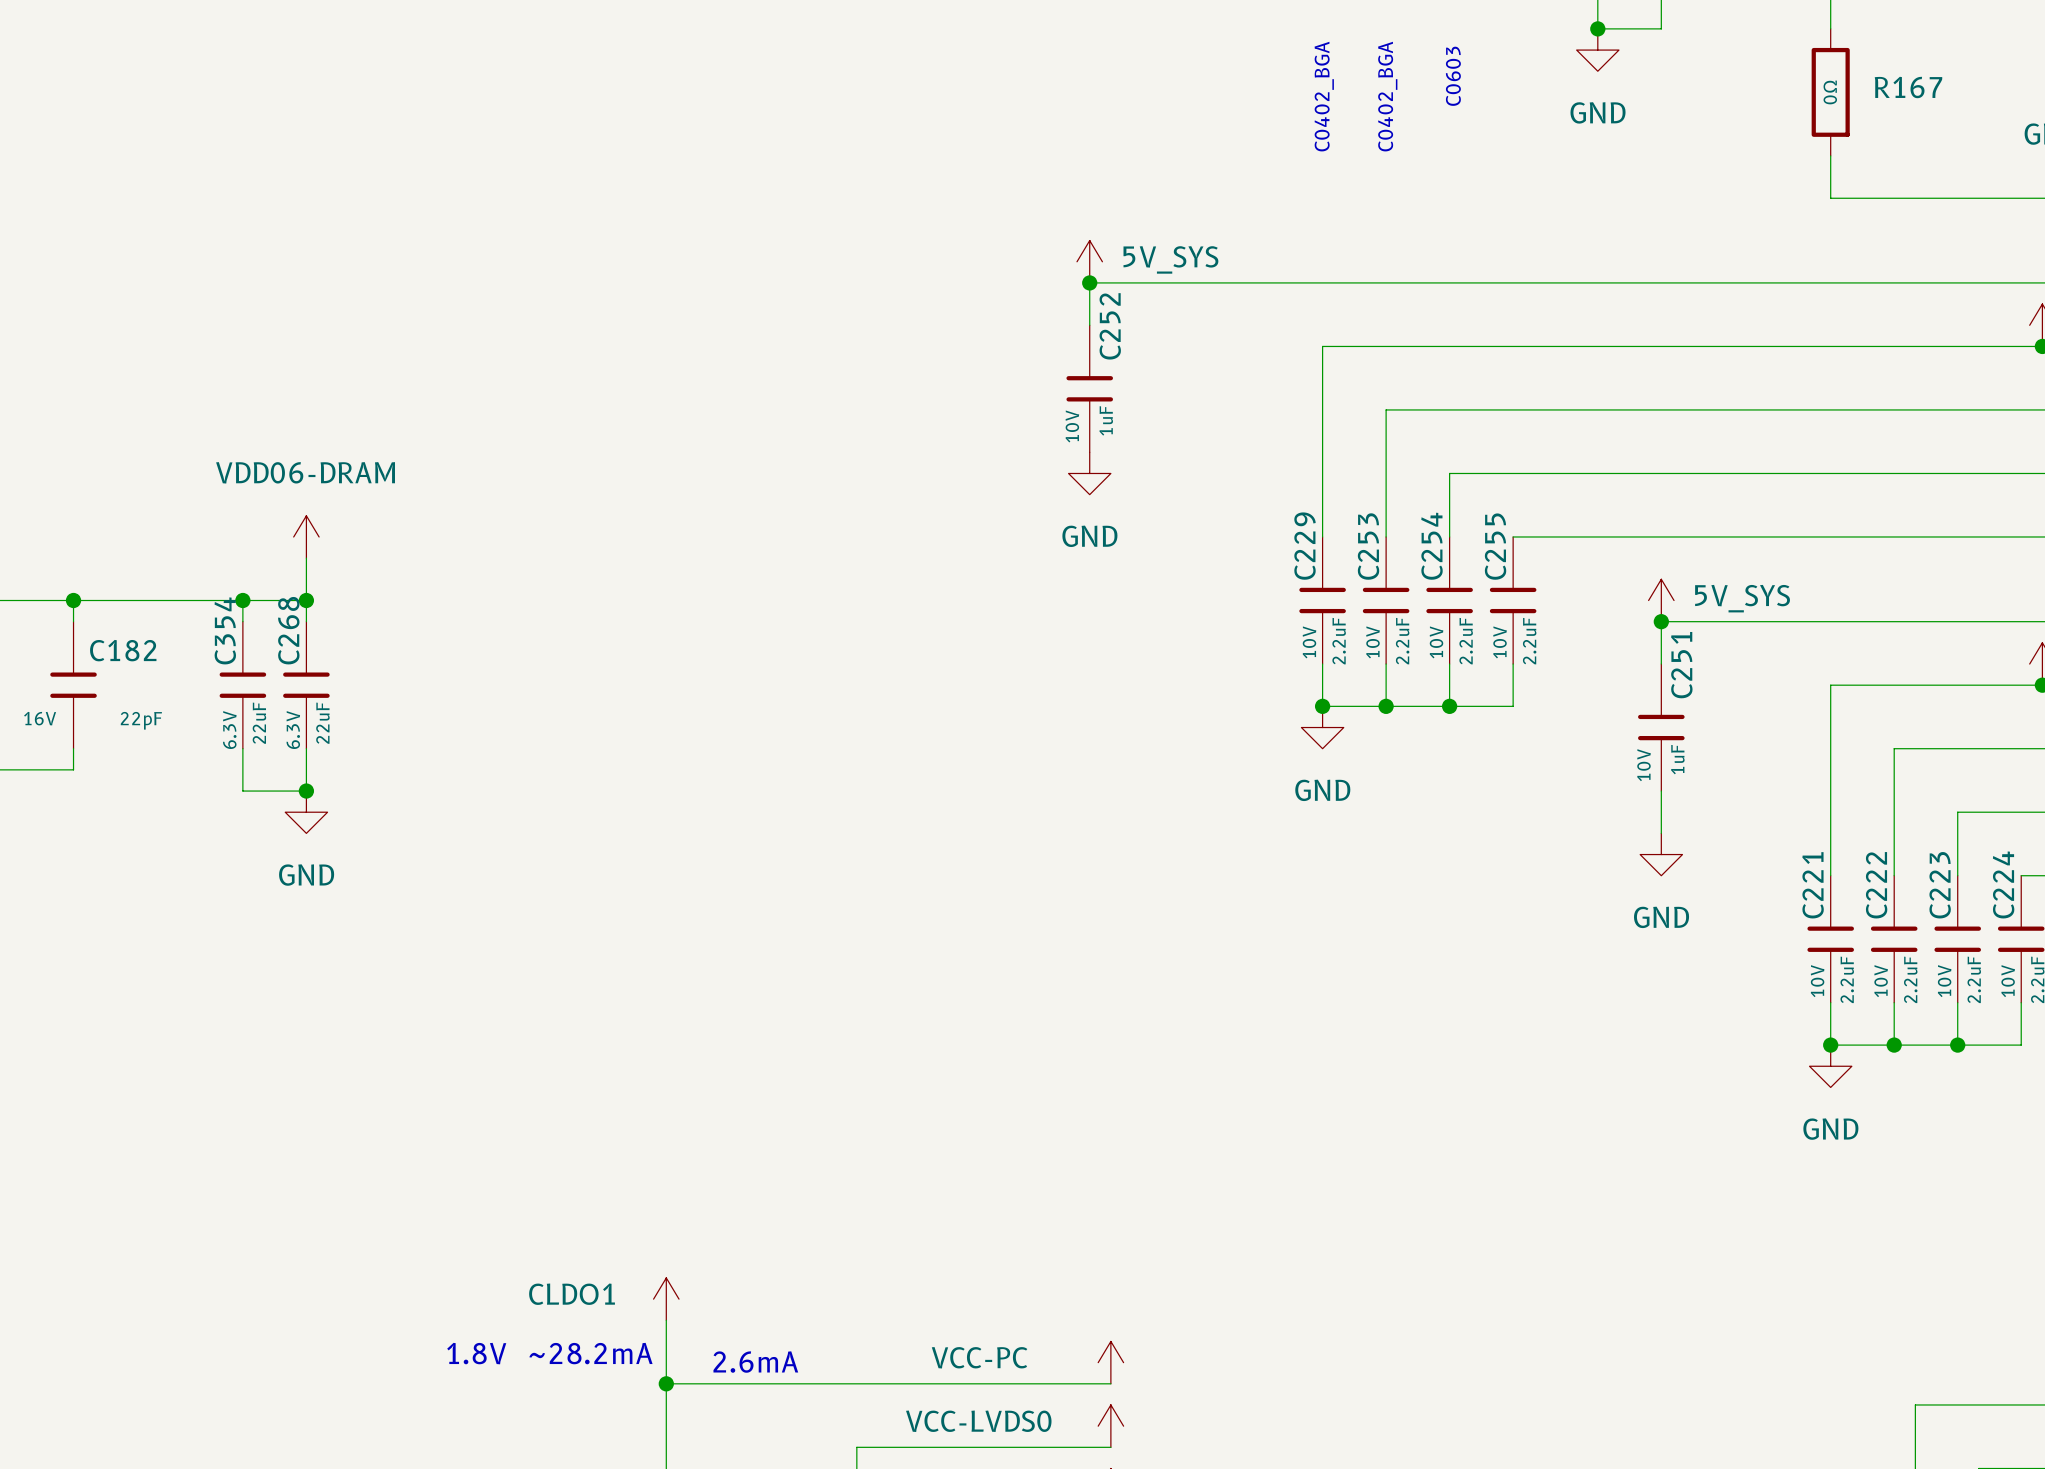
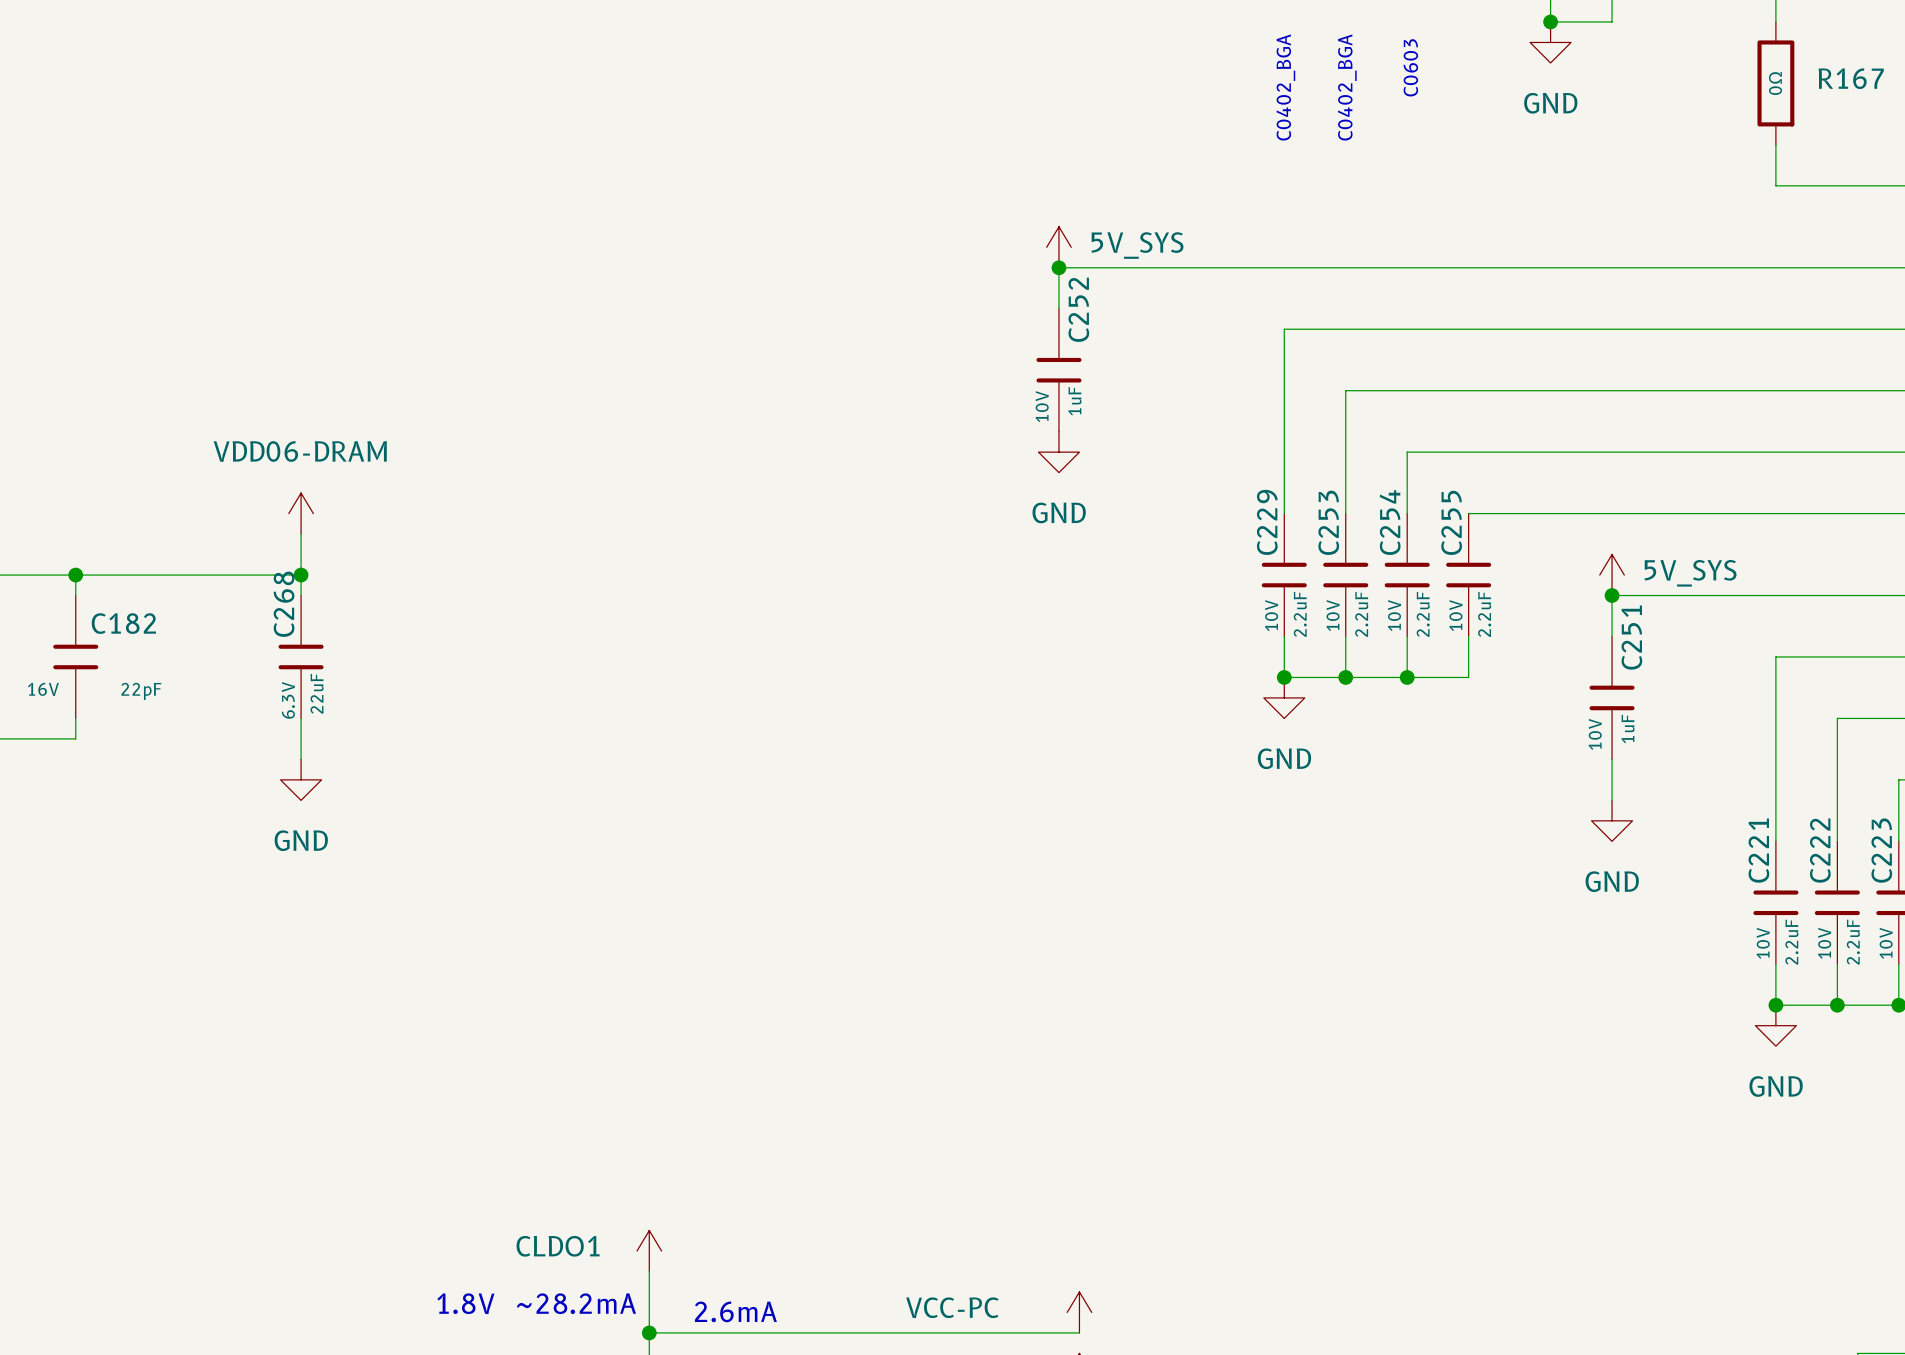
wire: (242, 600) (242, 621) -> none
junction: (242, 600) -> none
C354: 22uF (242, 685) -> none
wire: (242, 748) (242, 791) (306, 791) -> none
junction: (306, 791) -> none

